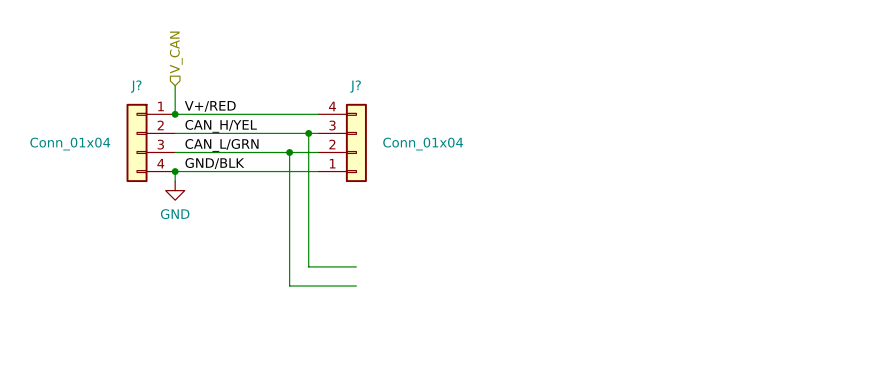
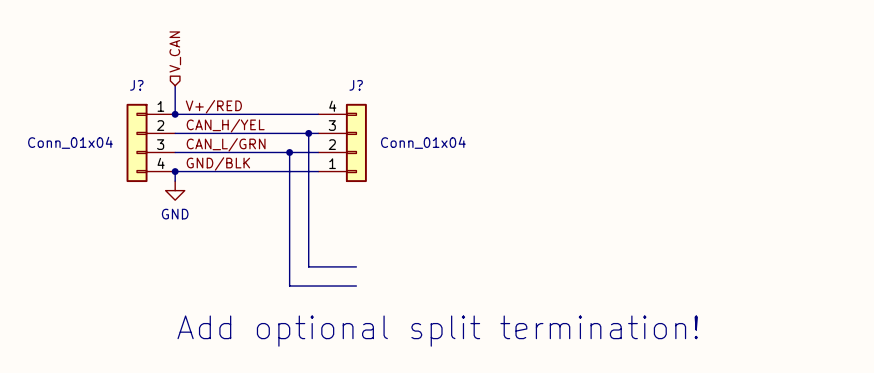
text: none -> Add optional split termination! (437, 331)

